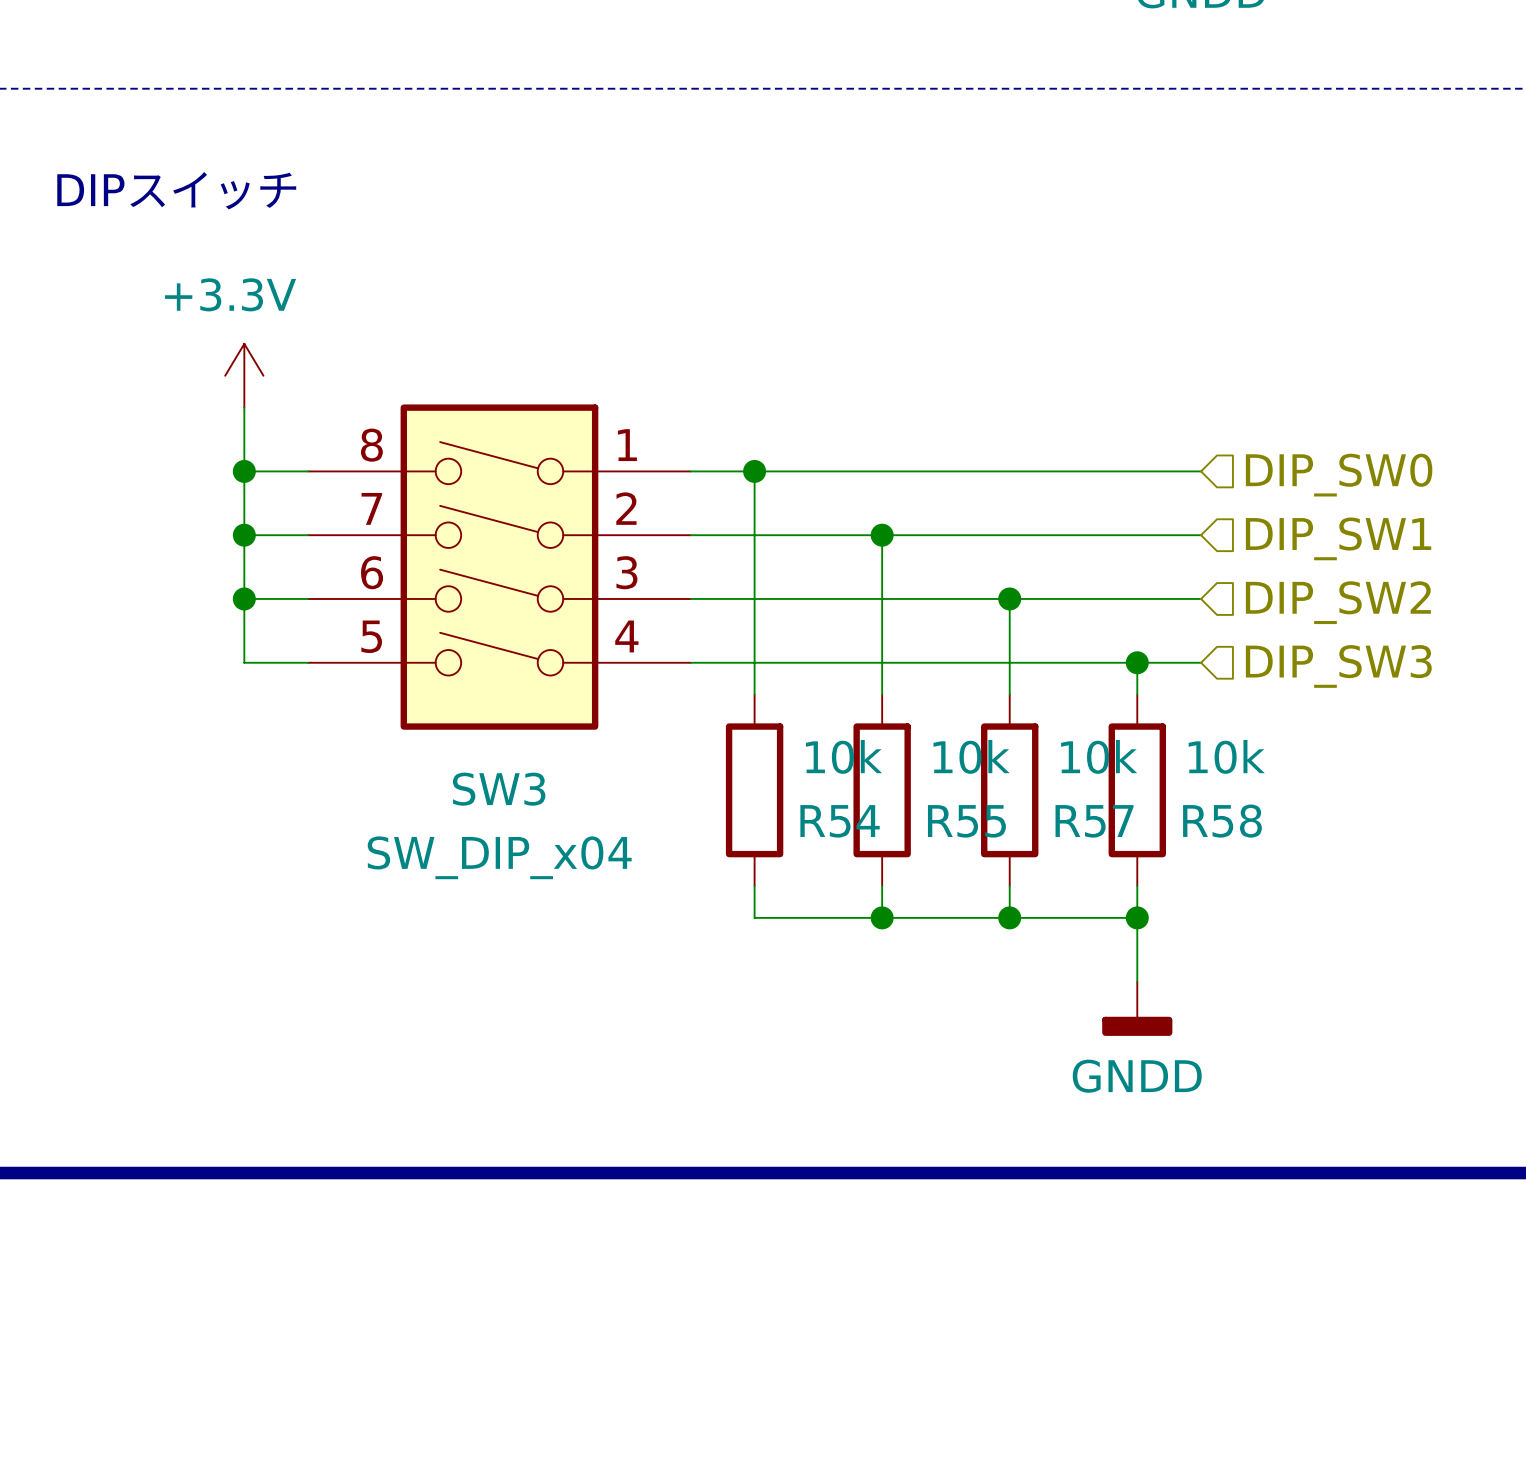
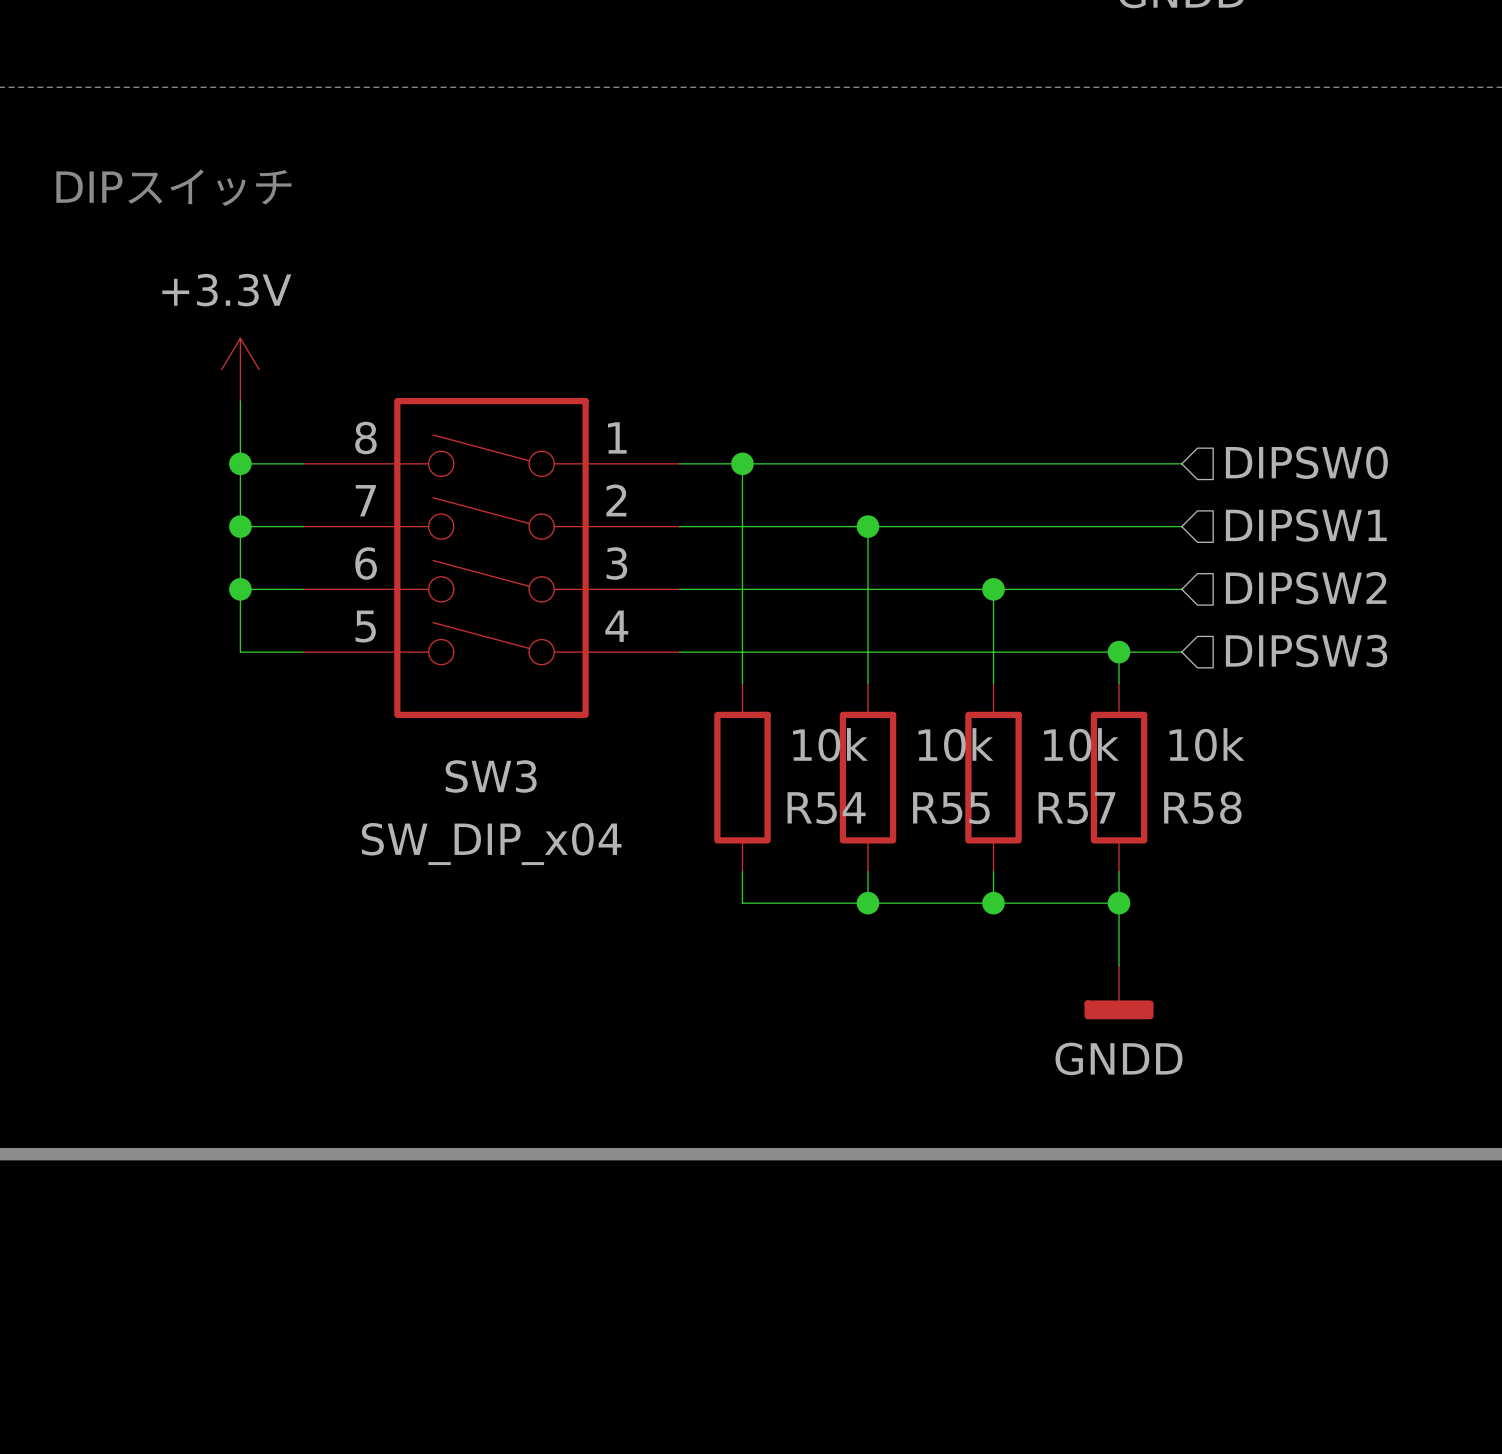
hierarchical label: DIP_SW0 (1339, 475) -> DIPSW0 (1306, 462)
hierarchical label: DIP_SW1 (1338, 538) -> DIPSW1 (1306, 525)
hierarchical label: DIP_SW2 (1338, 602) -> DIPSW2 (1306, 588)
hierarchical label: DIP_SW3 (1338, 666) -> DIPSW3 (1306, 650)

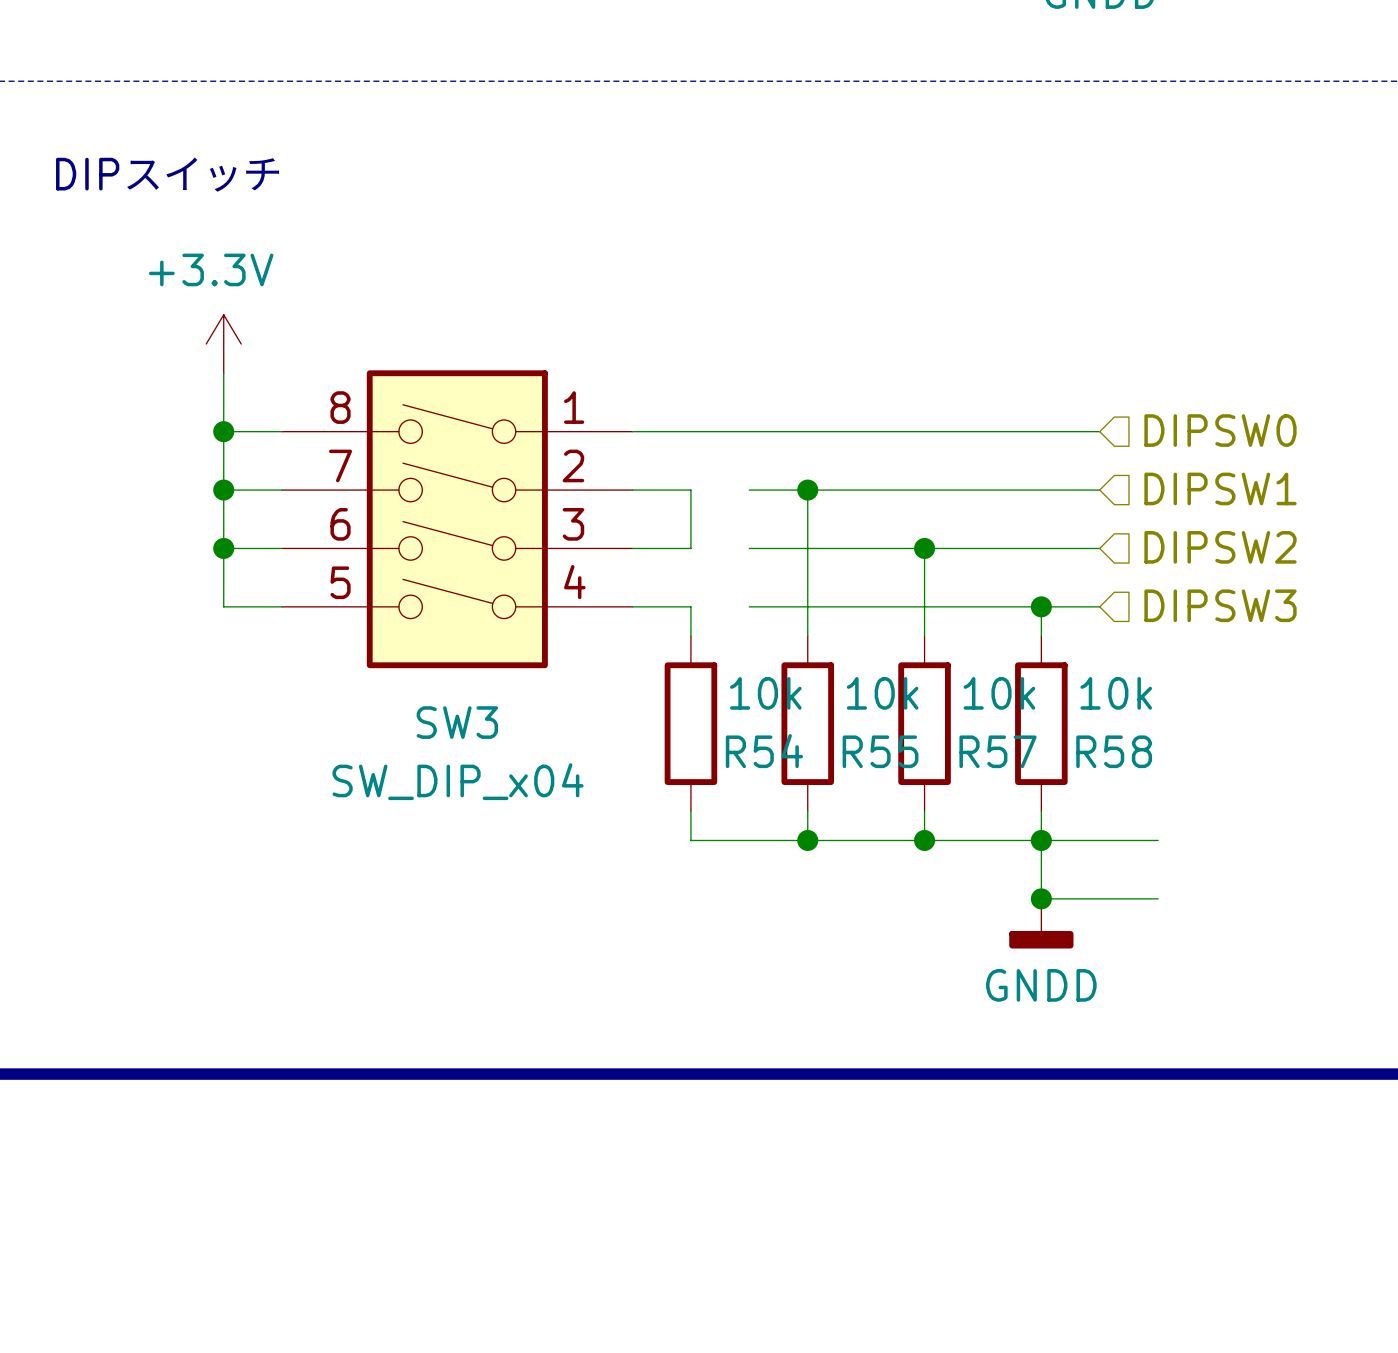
wire: (742, 463) (742, 526) (805, 526) -> none
junction: (742, 463) -> none
wire: (805, 589) (742, 589) (742, 652) (805, 652) -> none
wire: none -> (1041, 840) (1158, 840)
wire: none -> (1041, 898) (1158, 898)
junction: none -> (1041, 898)

